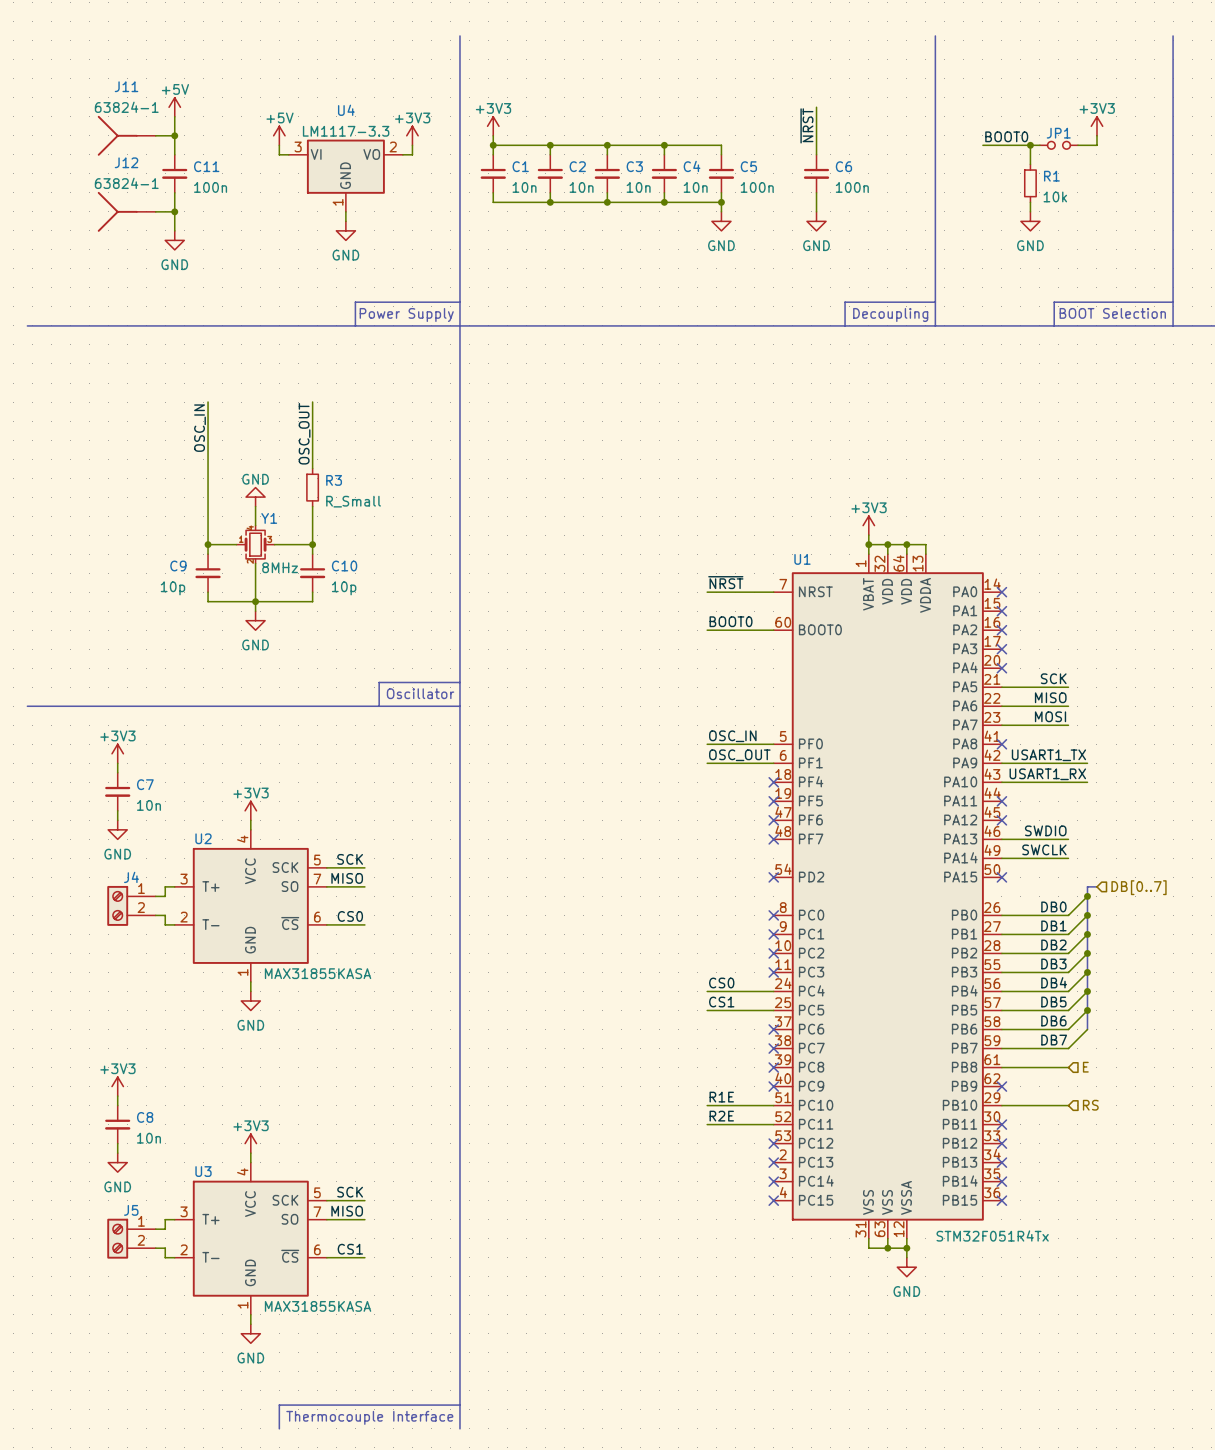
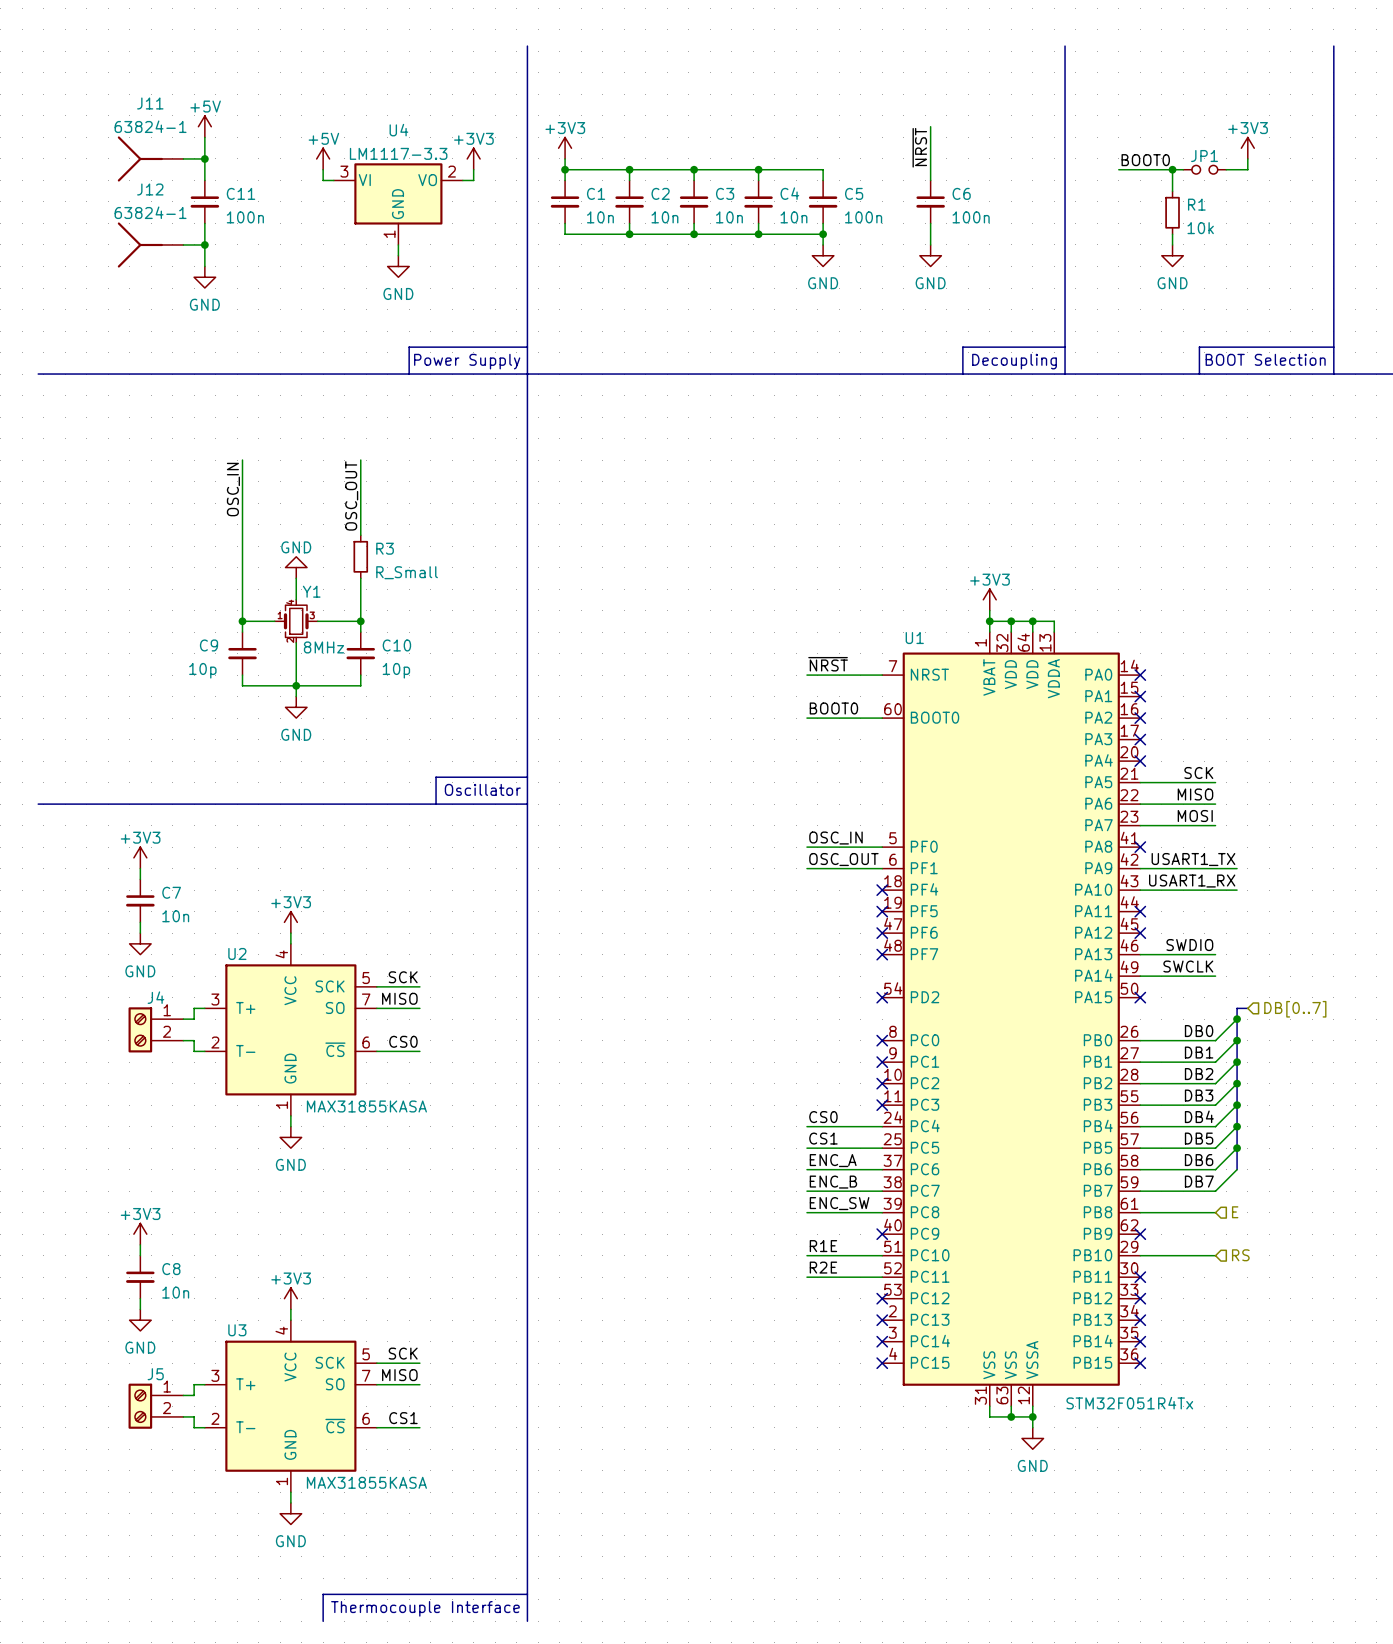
label: none -> ENC_A (833, 1160)
wire: none -> (806, 1169) (882, 1169)
no-connect mark: (773, 1029) -> none
label: none -> ENC_B (833, 1182)
wire: none -> (806, 1191) (882, 1191)
no-connect mark: (773, 1048) -> none
label: none -> ENC_SW (839, 1203)
wire: none -> (806, 1212) (882, 1212)
no-connect mark: (773, 1067) -> none

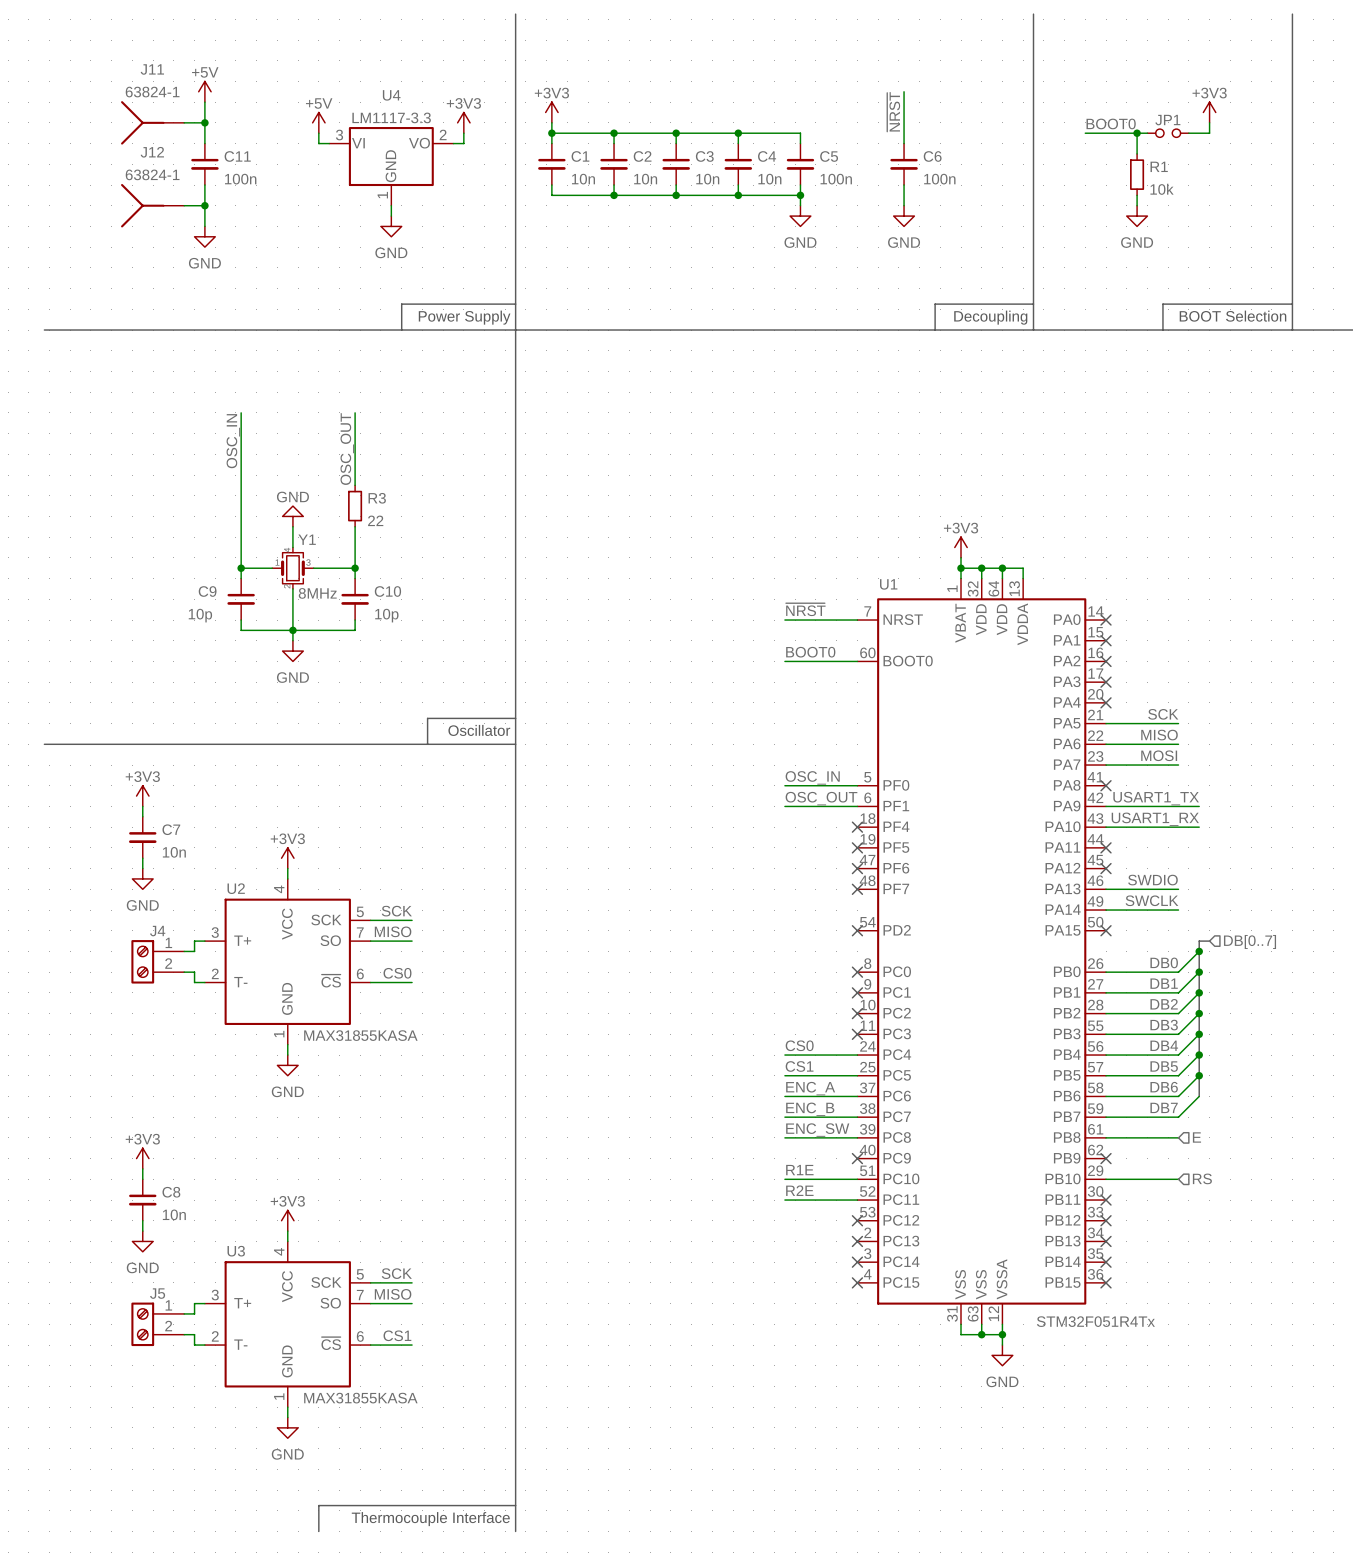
R3 value: R_Small (407, 572) -> 22 (375, 520)

